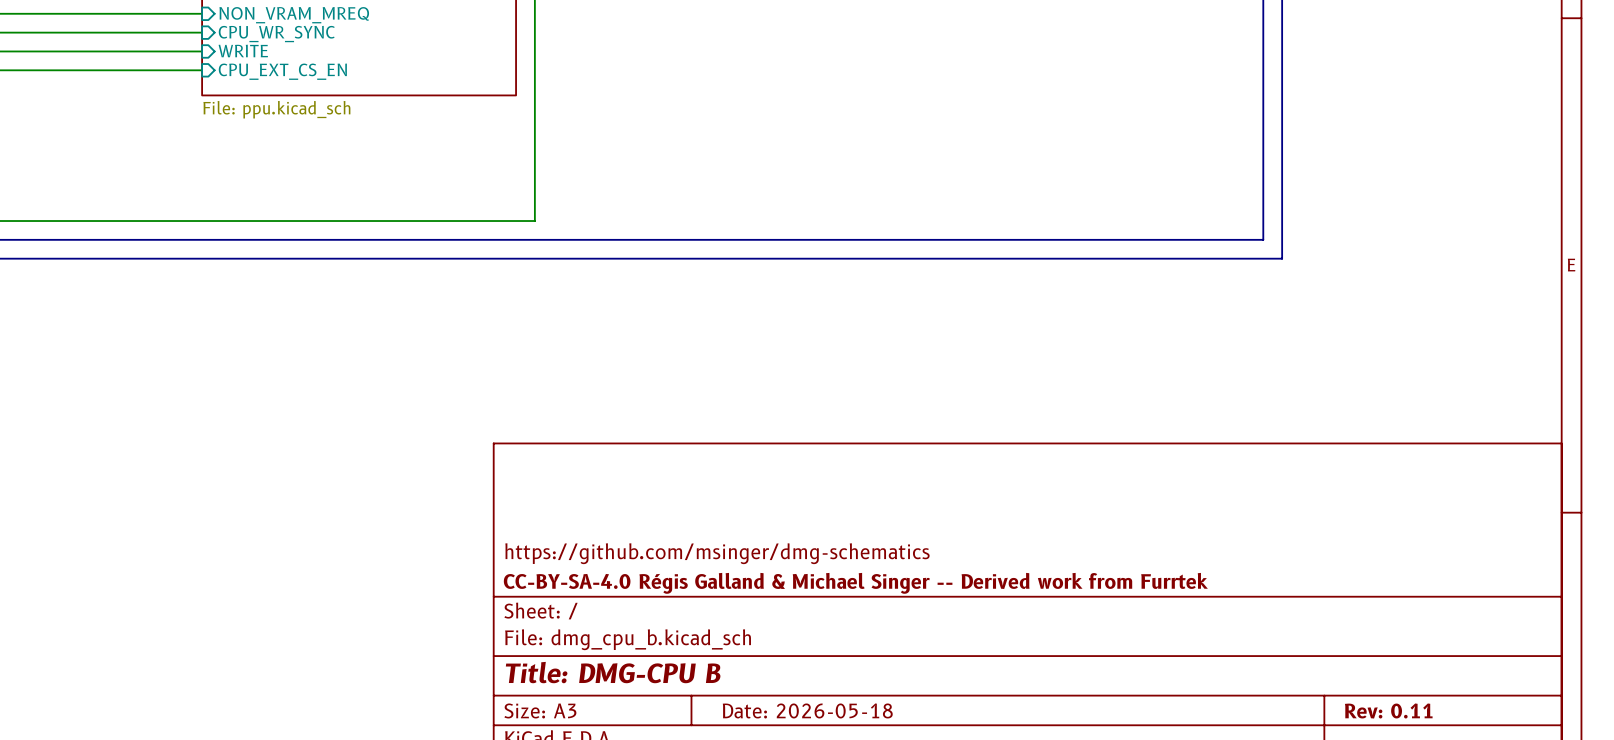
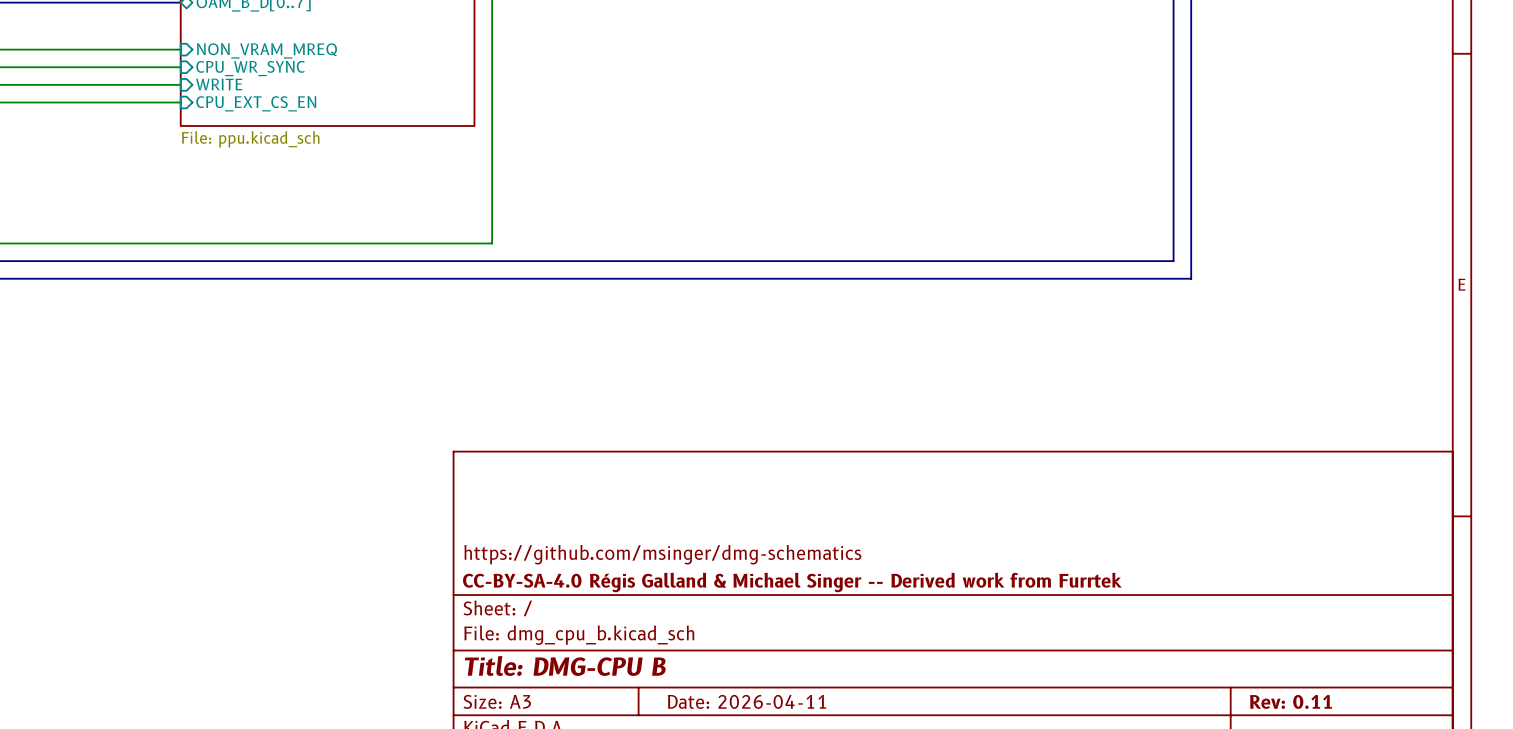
title block: Date: 2026-05-18 (807, 710) -> Date: 2026-04-11 (747, 701)

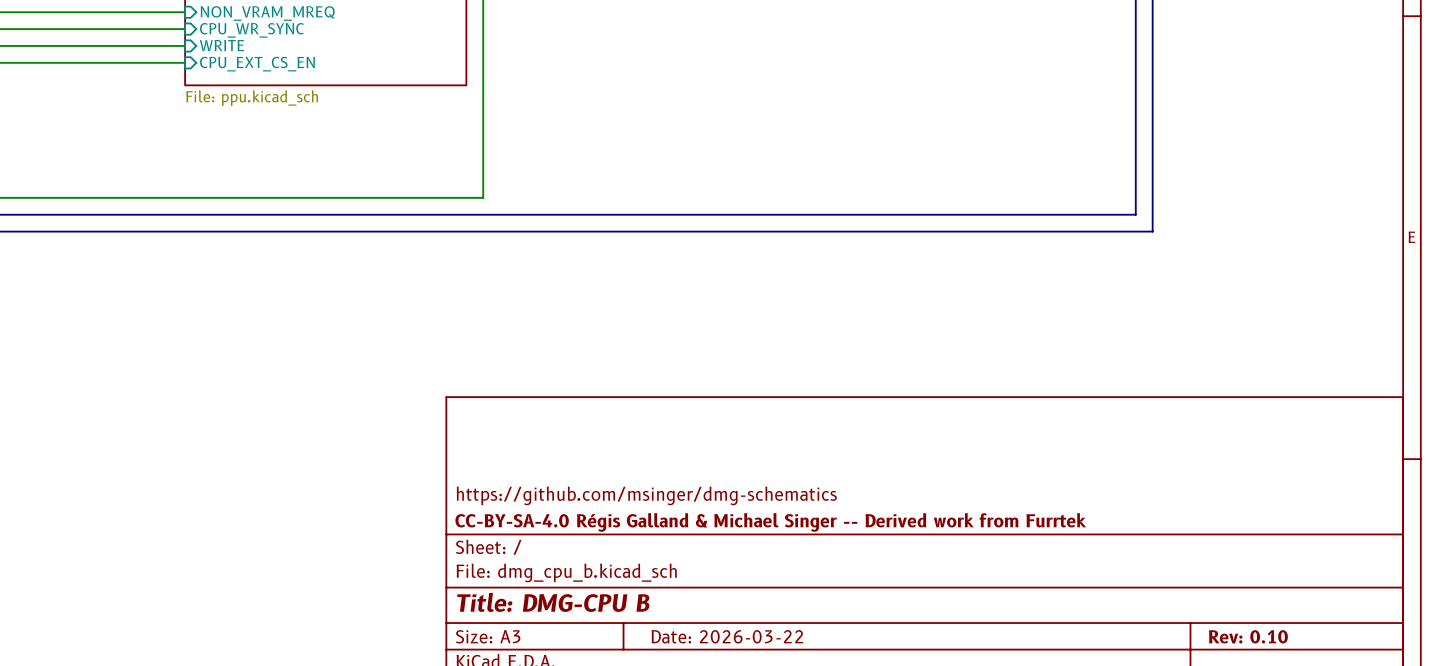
title block: Date: 2026-04-11 (747, 701) -> Date: 2026-03-22 (727, 636)
title block: Rev: 0.11 (1290, 701) -> Rev: 0.10 (1248, 636)

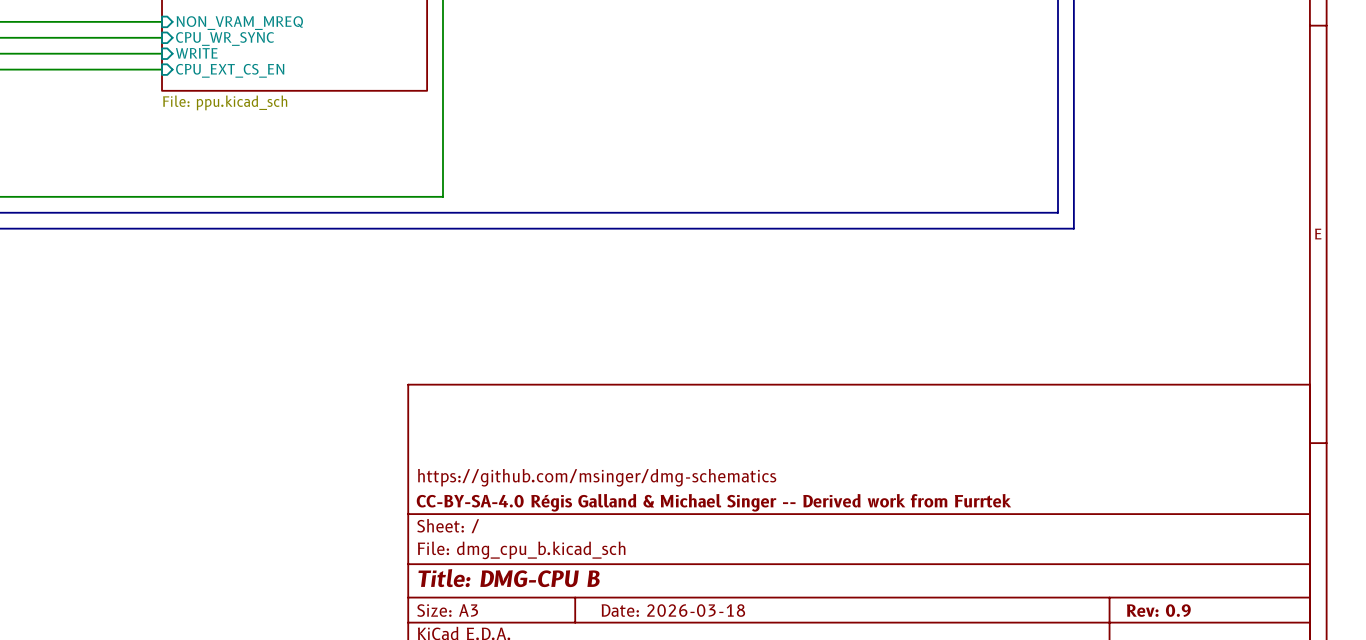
title block: Date: 2026-03-22 (727, 636) -> Date: 2026-03-18 (673, 610)
title block: Rev: 0.10 (1248, 636) -> Rev: 0.9 (1158, 610)

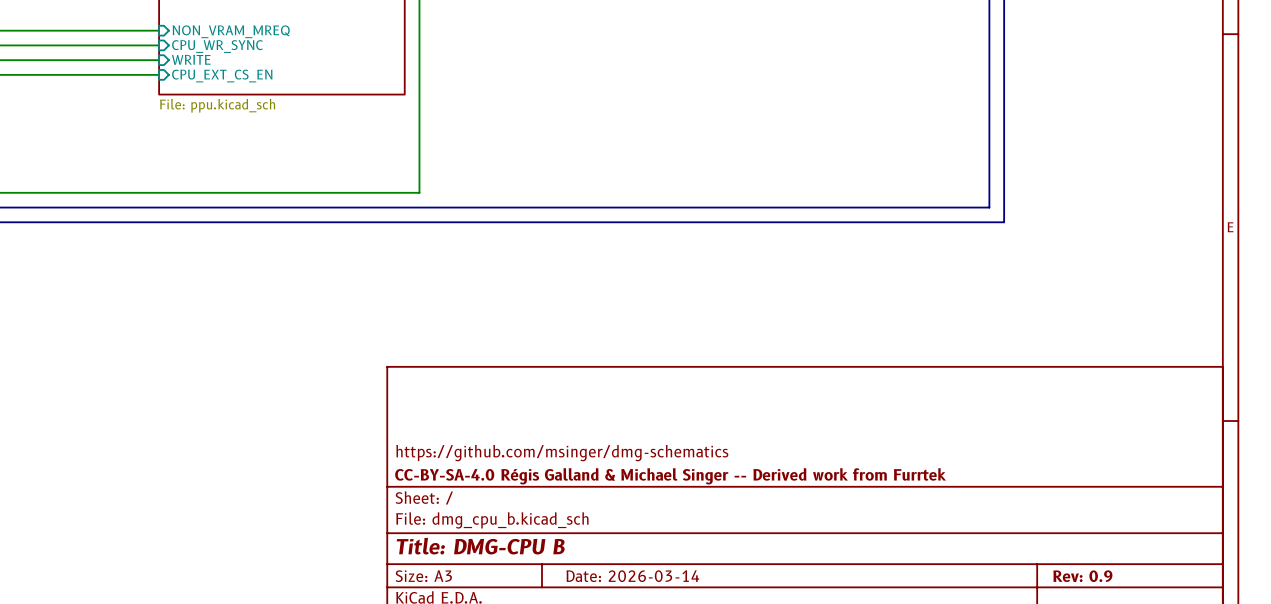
title block: Date: 2026-03-18 (673, 610) -> Date: 2026-03-14 (632, 576)

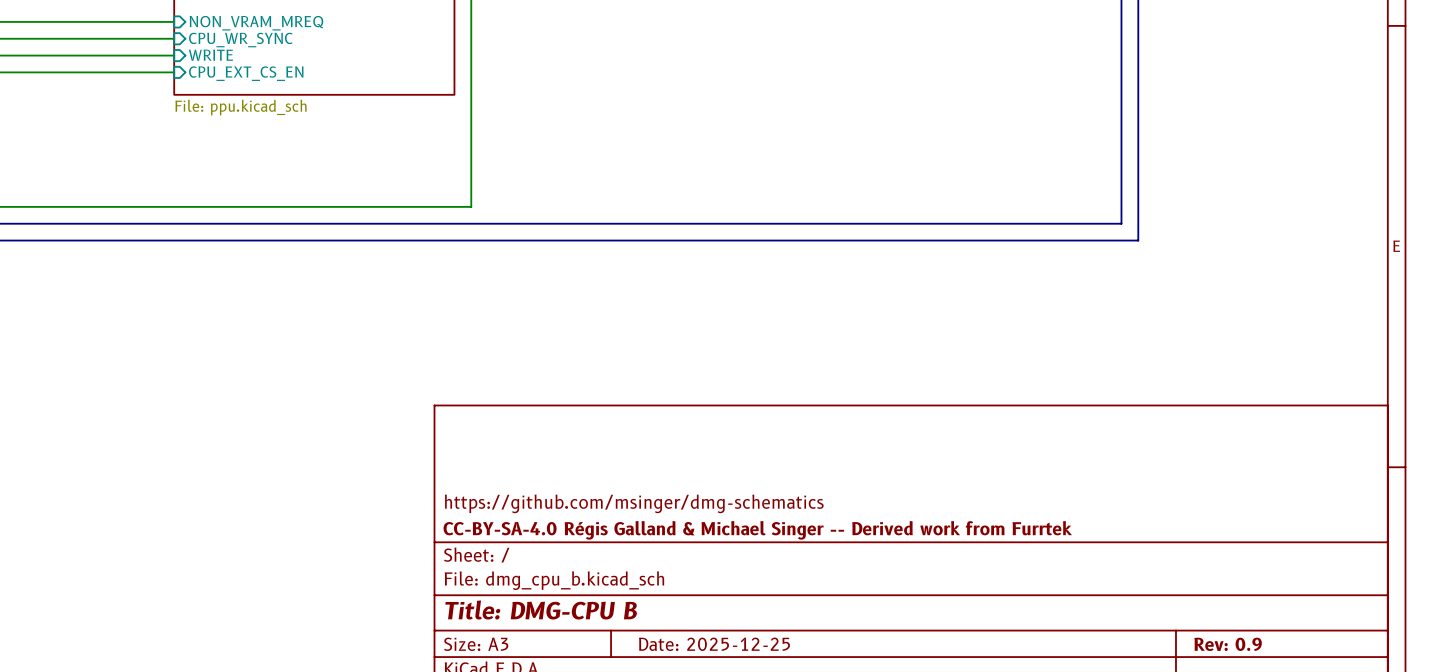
title block: Date: 2026-03-14 (632, 576) -> Date: 2025-12-25 (714, 644)

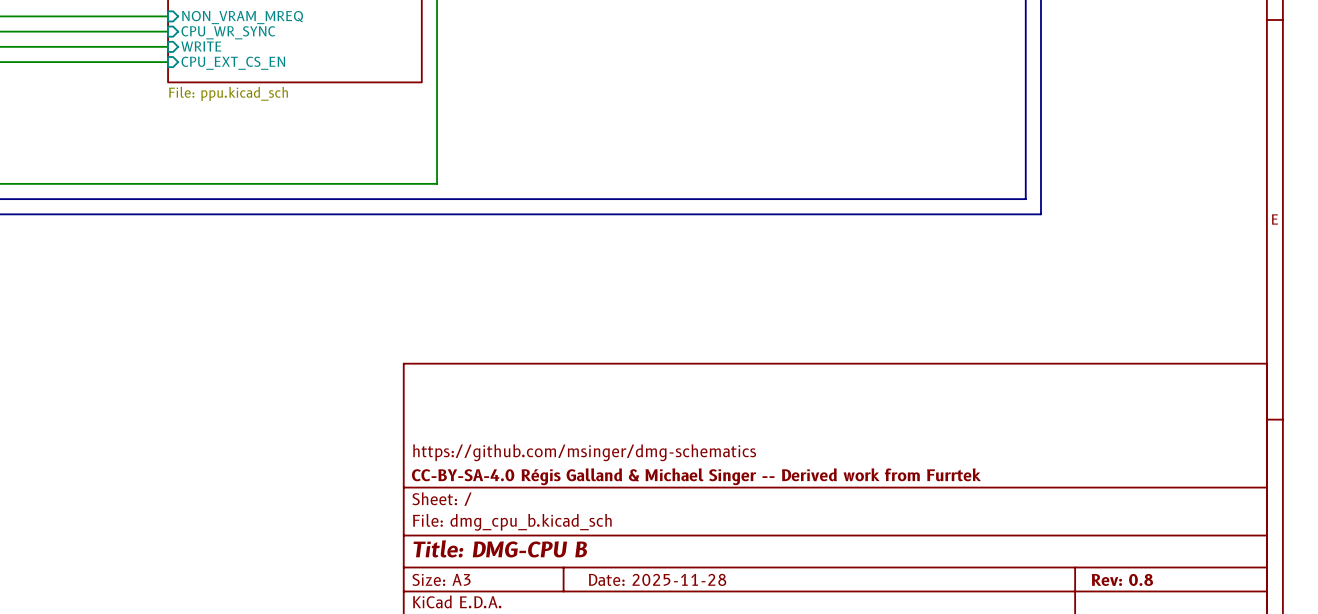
title block: Date: 2025-12-25 (714, 644) -> Date: 2025-11-28 (657, 579)
title block: Rev: 0.9 (1228, 644) -> Rev: 0.8 (1122, 579)

